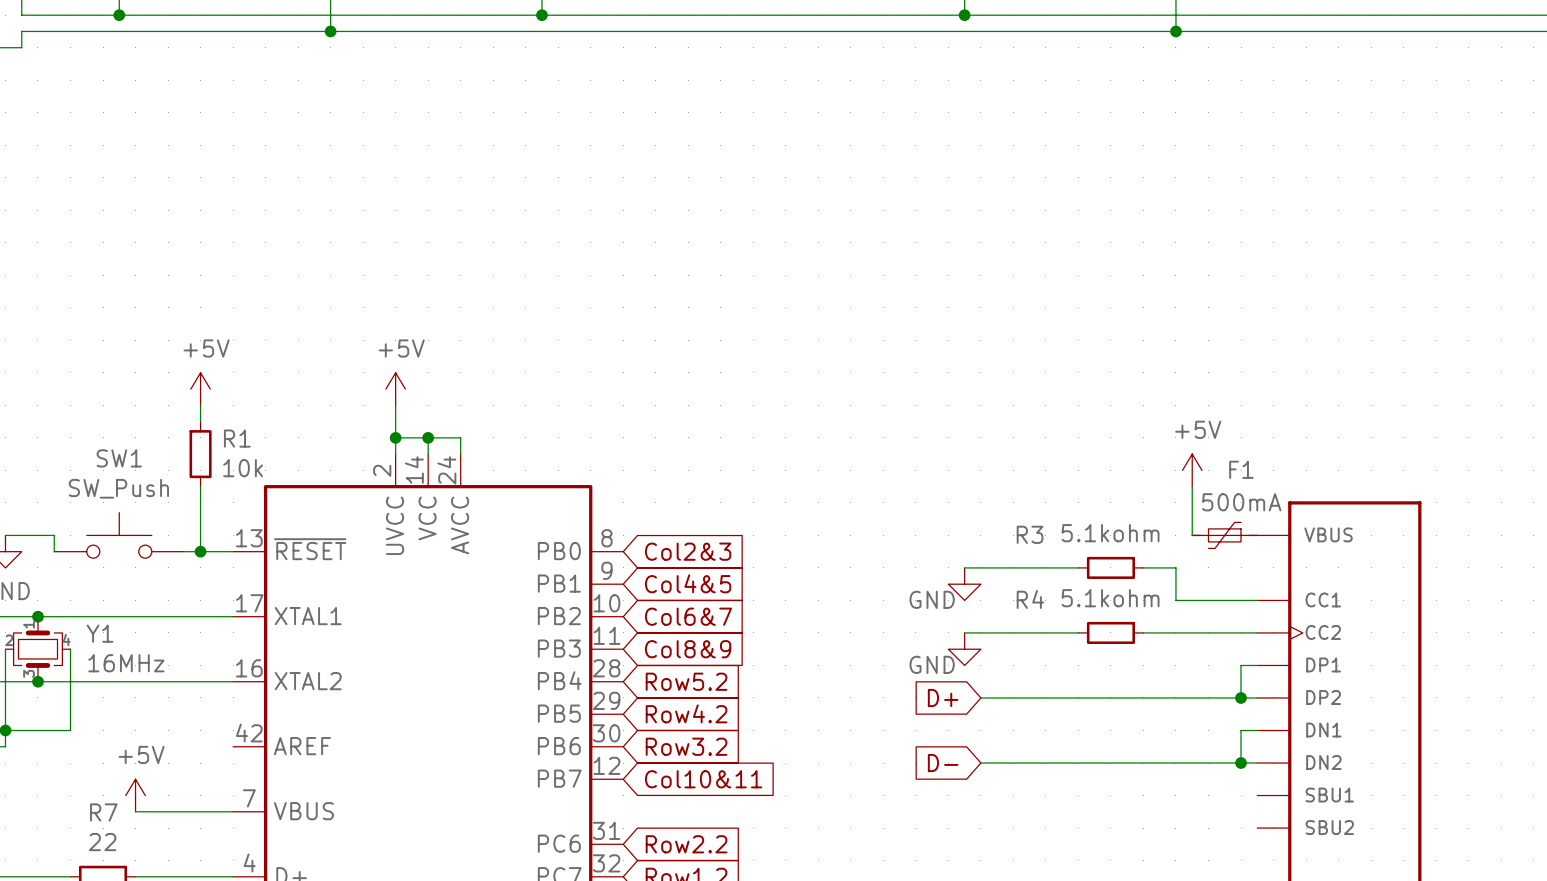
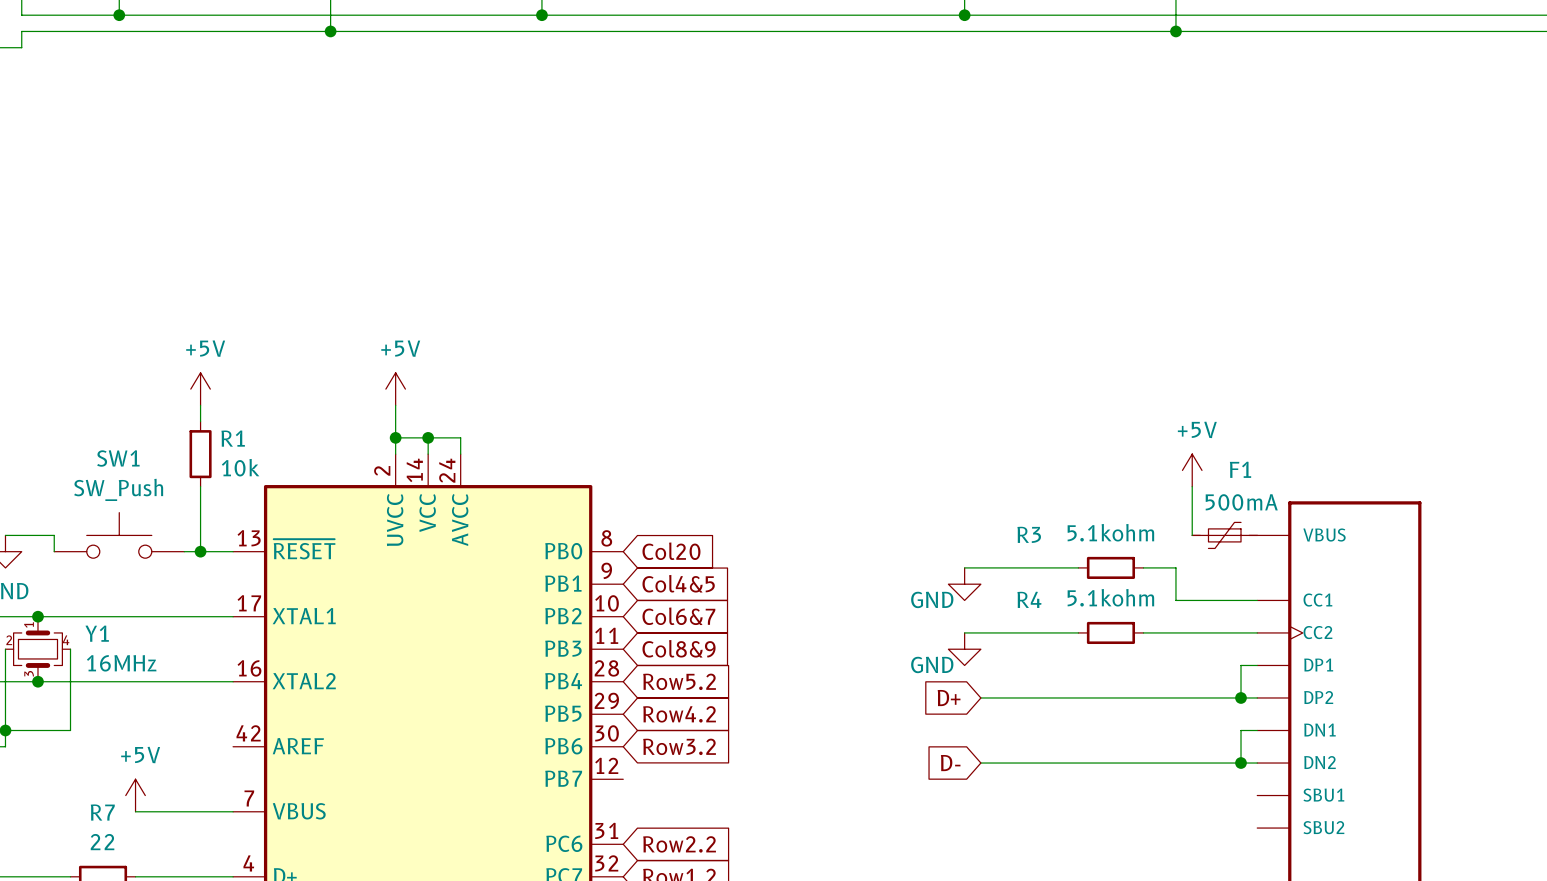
global label: Col2&3 (688, 551) -> Col20 (671, 551)
global label: Col10&11 (703, 779) -> none

